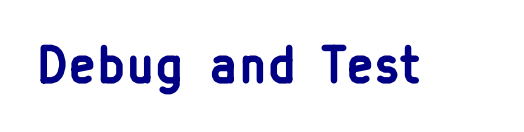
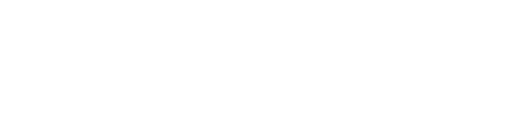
text: Debug and Test (229, 69) -> none

